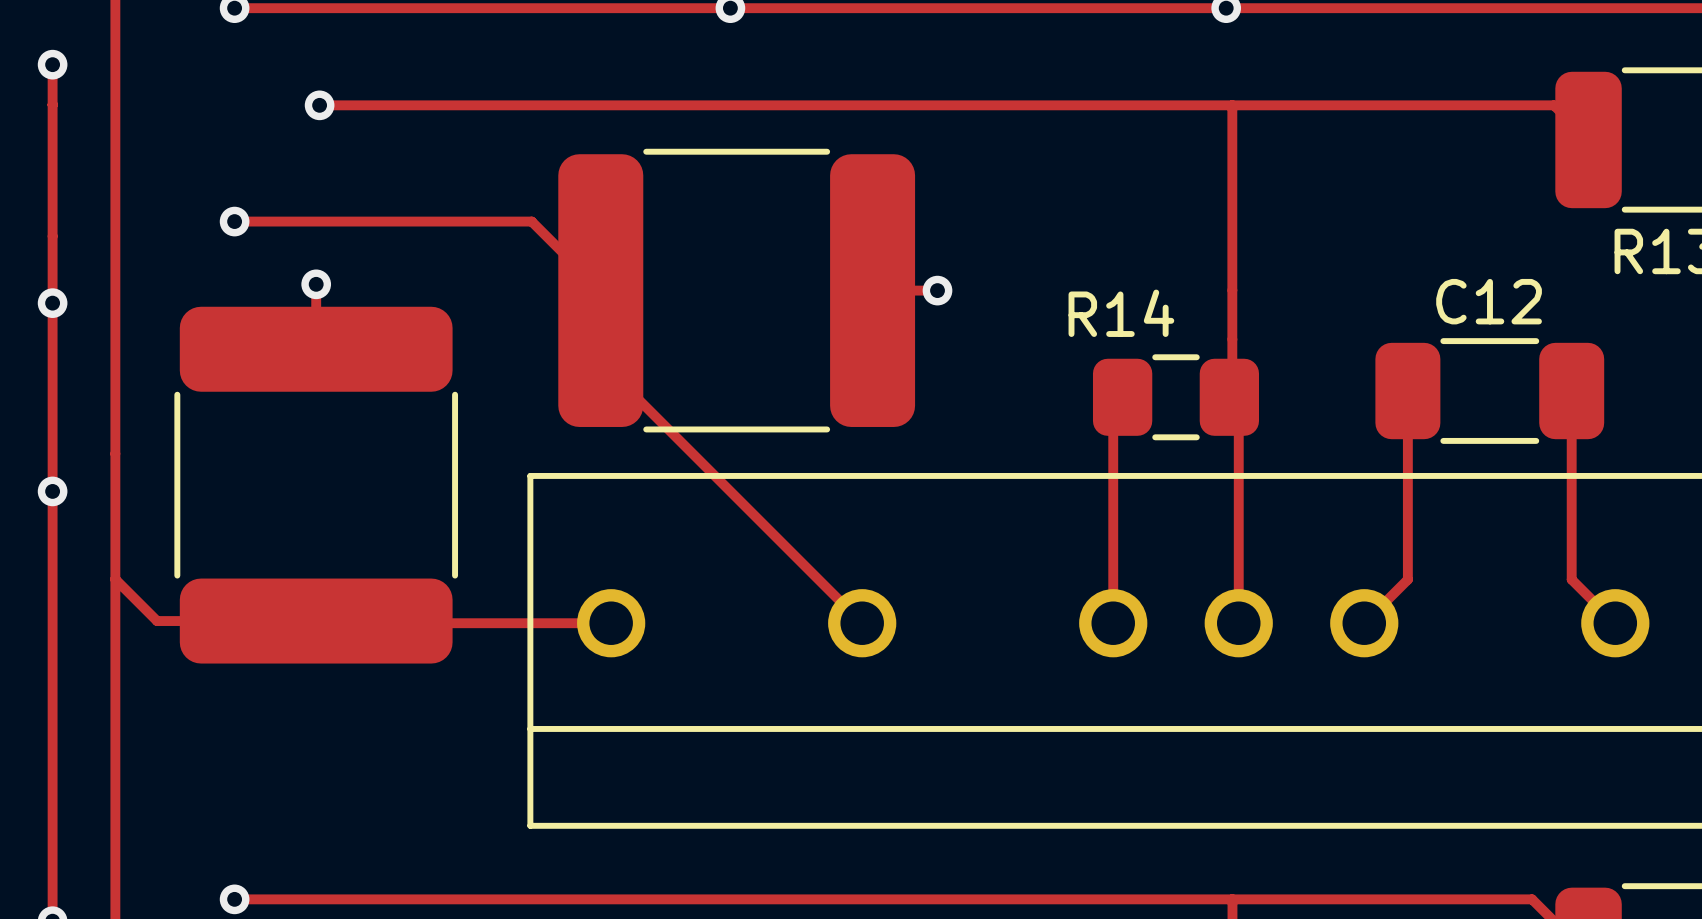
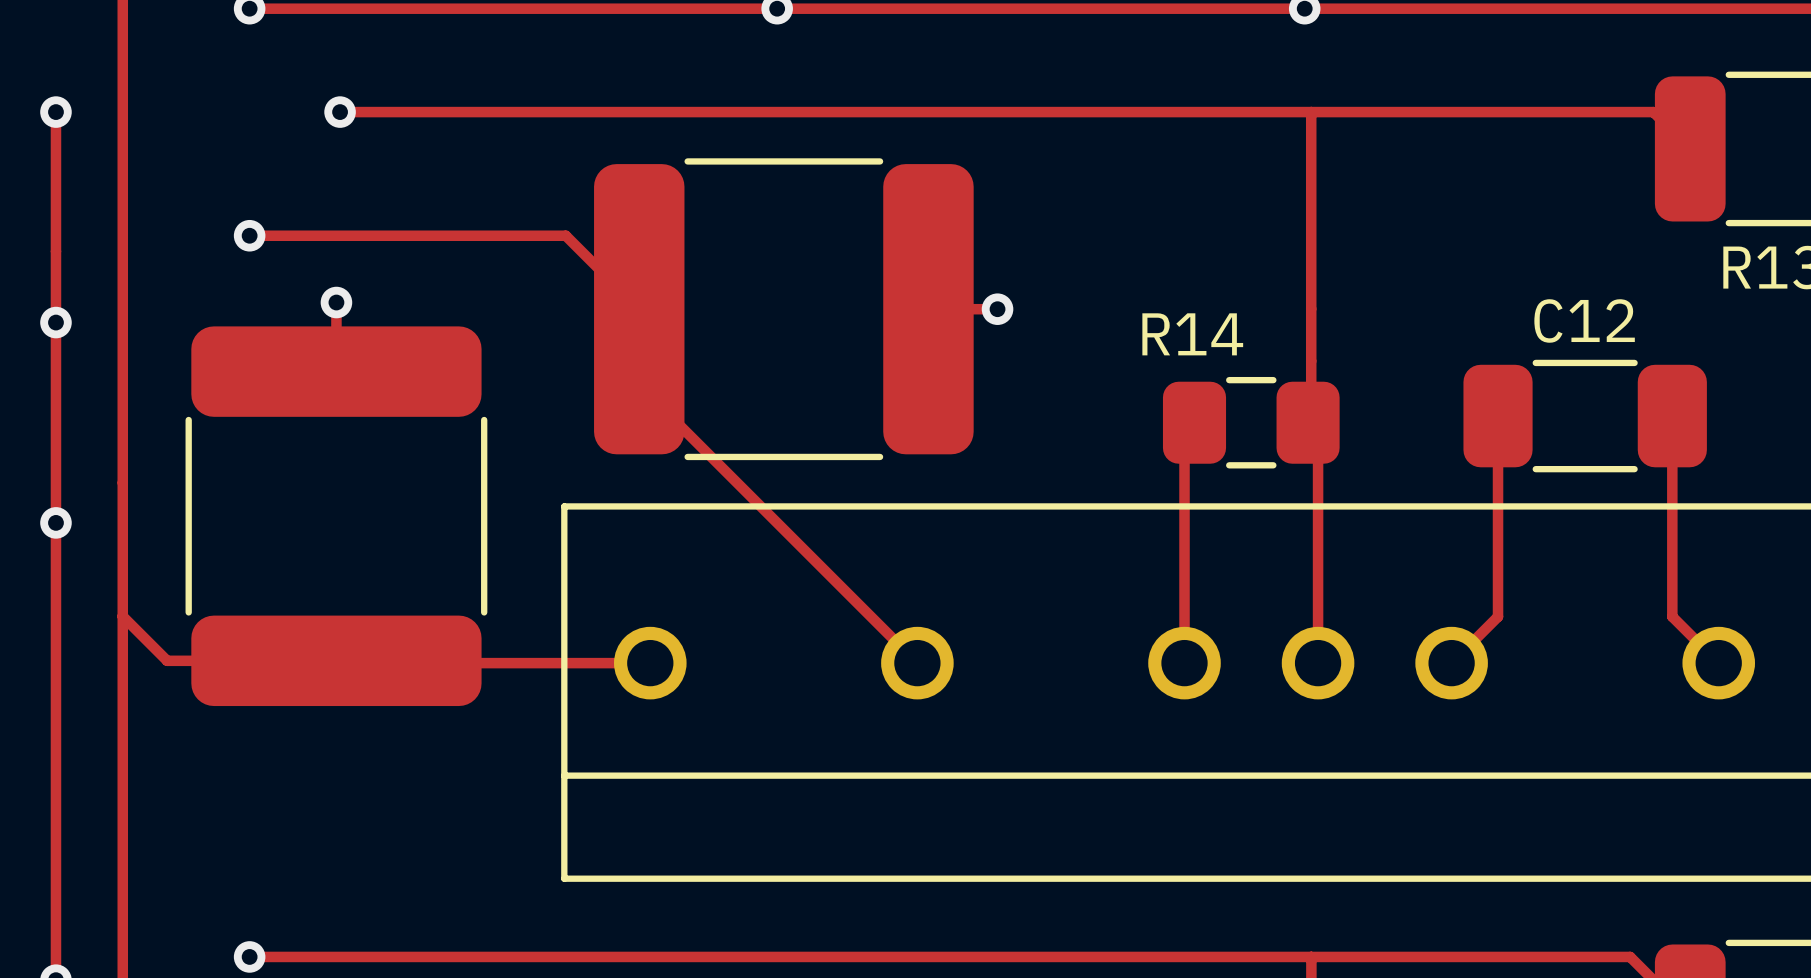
track: (52, 64) (52, 104) -> none
via position: (52, 64) -> (55, 112)

